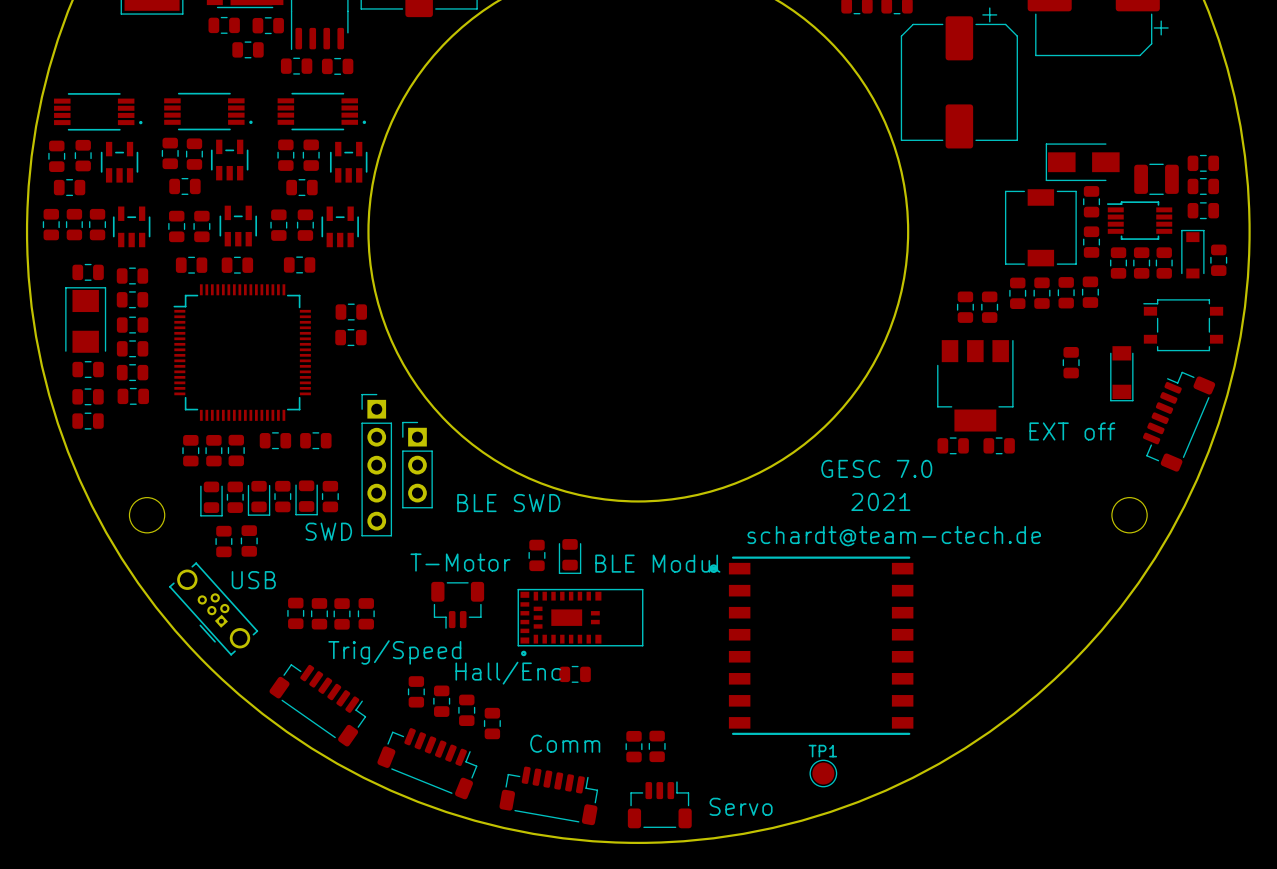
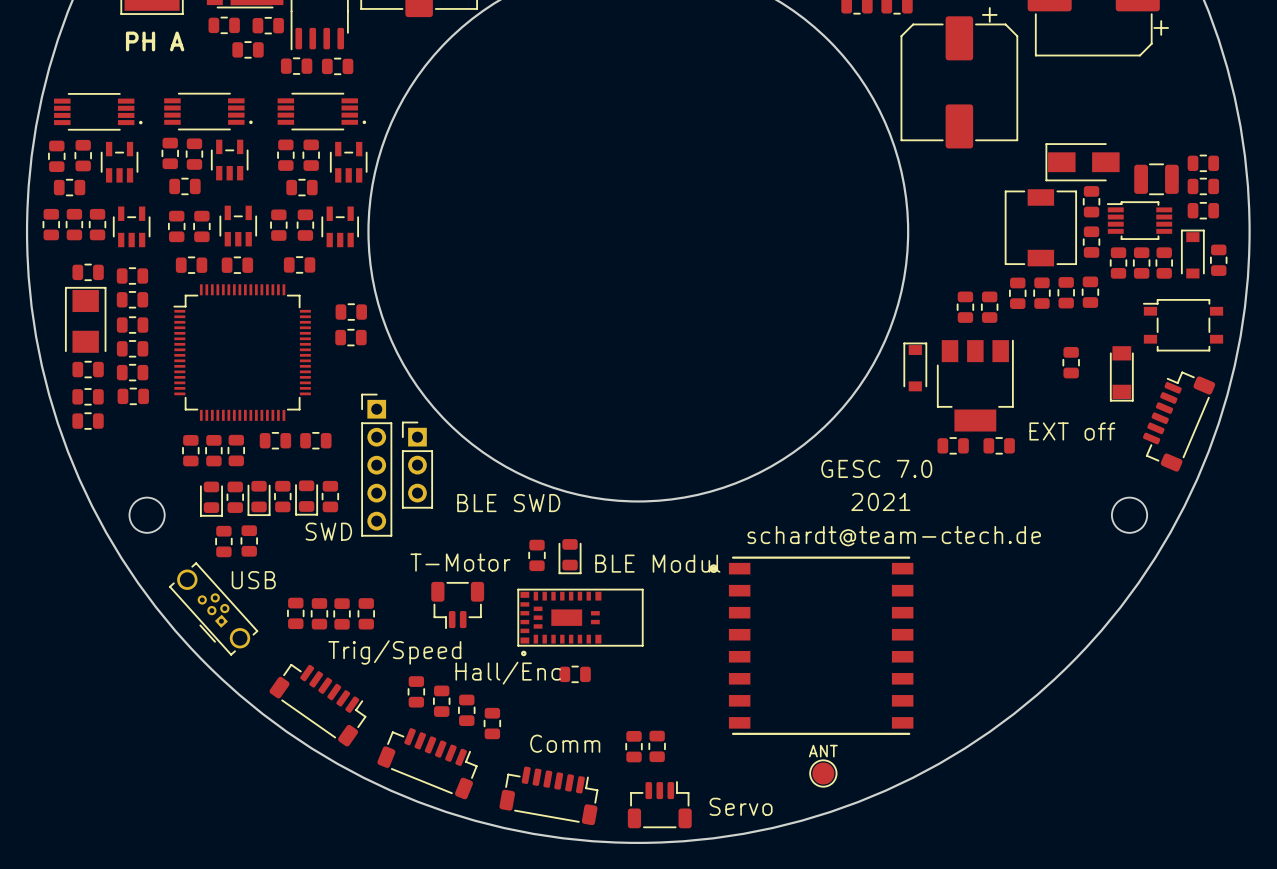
text: none -> PH A (155, 41)
part: none -> (915, 367)
TP1 name: TP1 (822, 751) -> ANT (823, 751)

